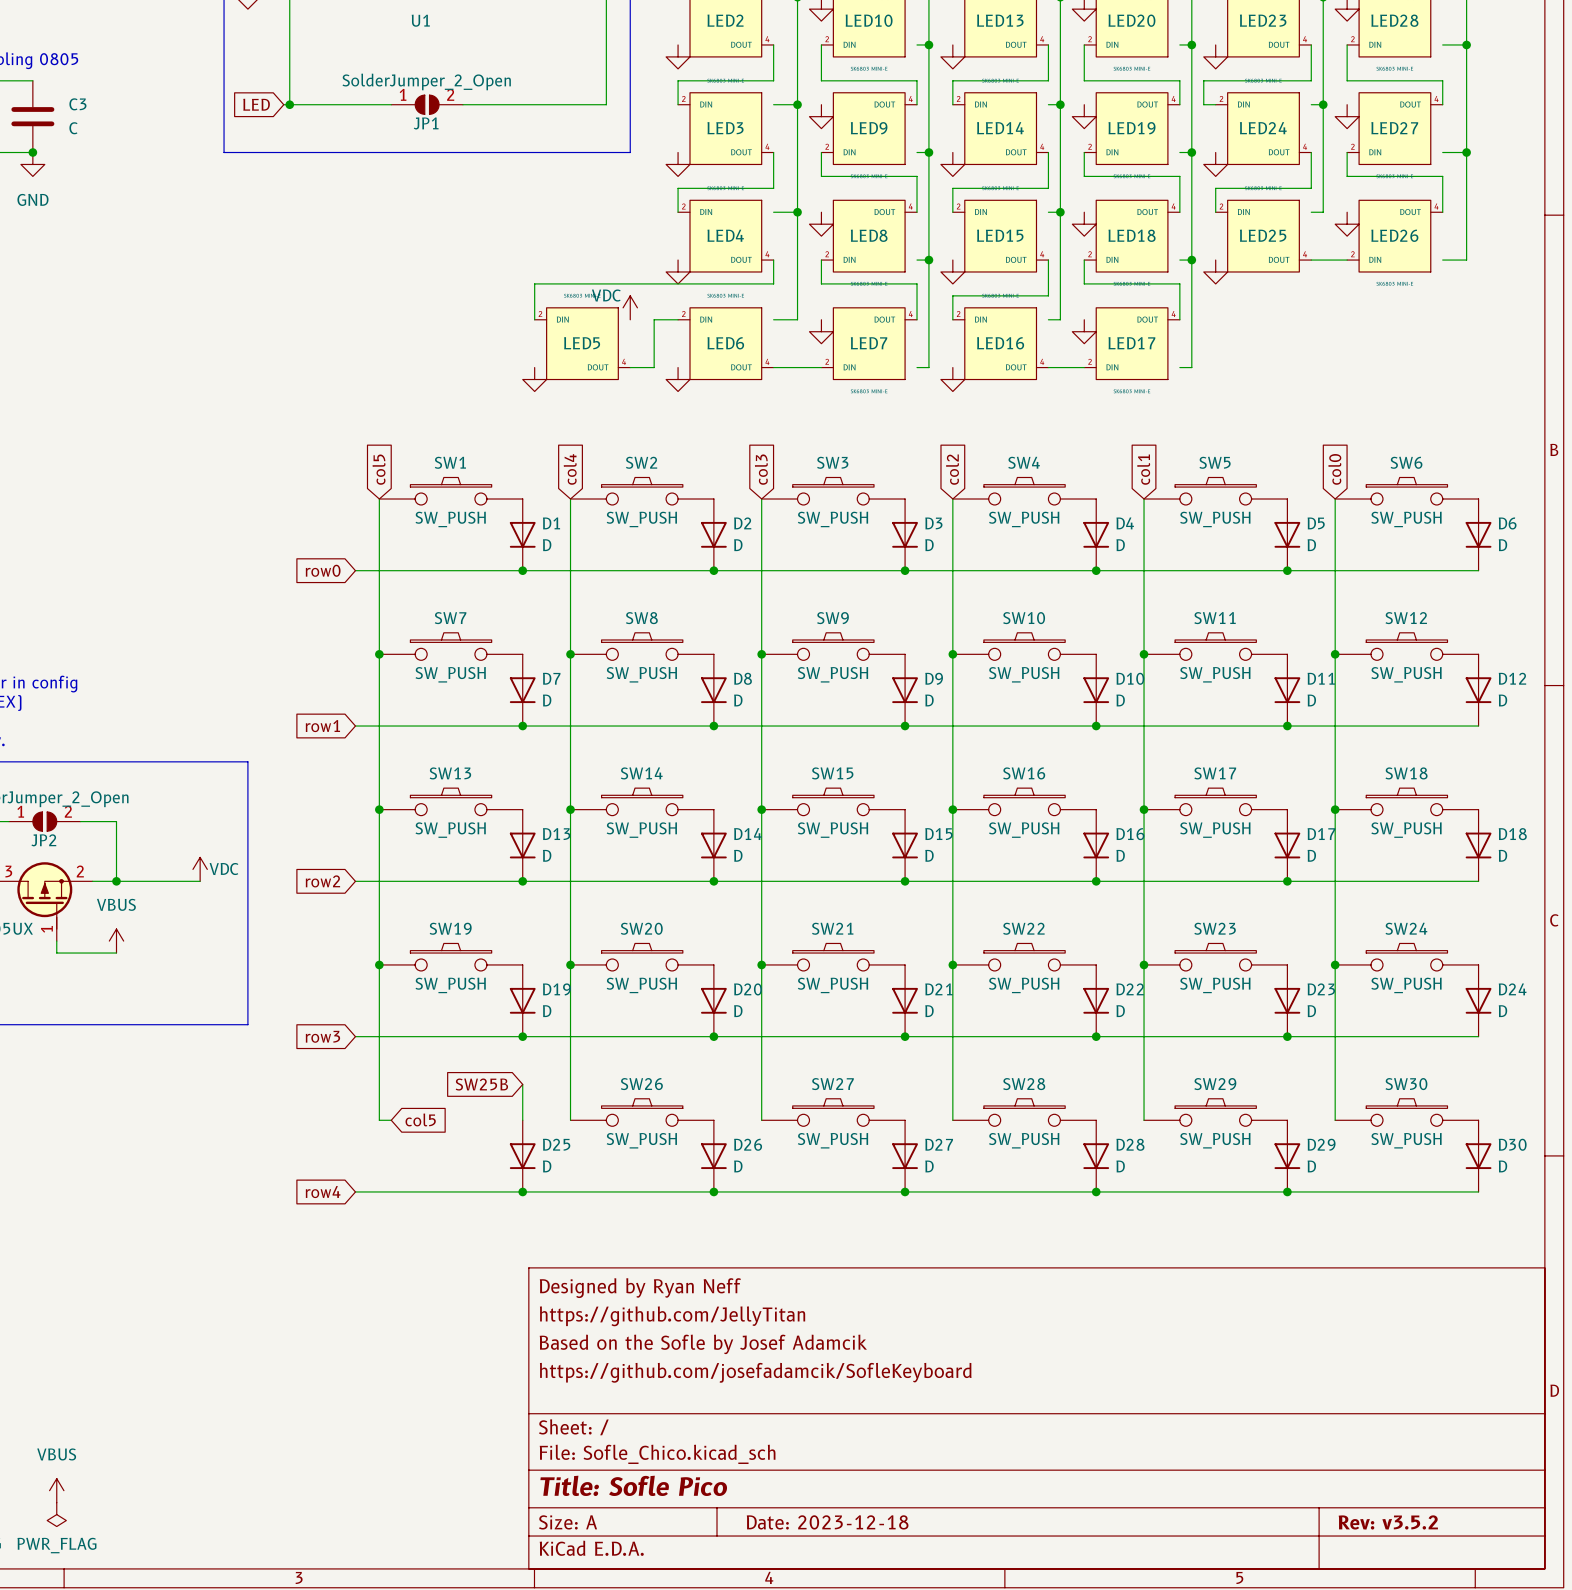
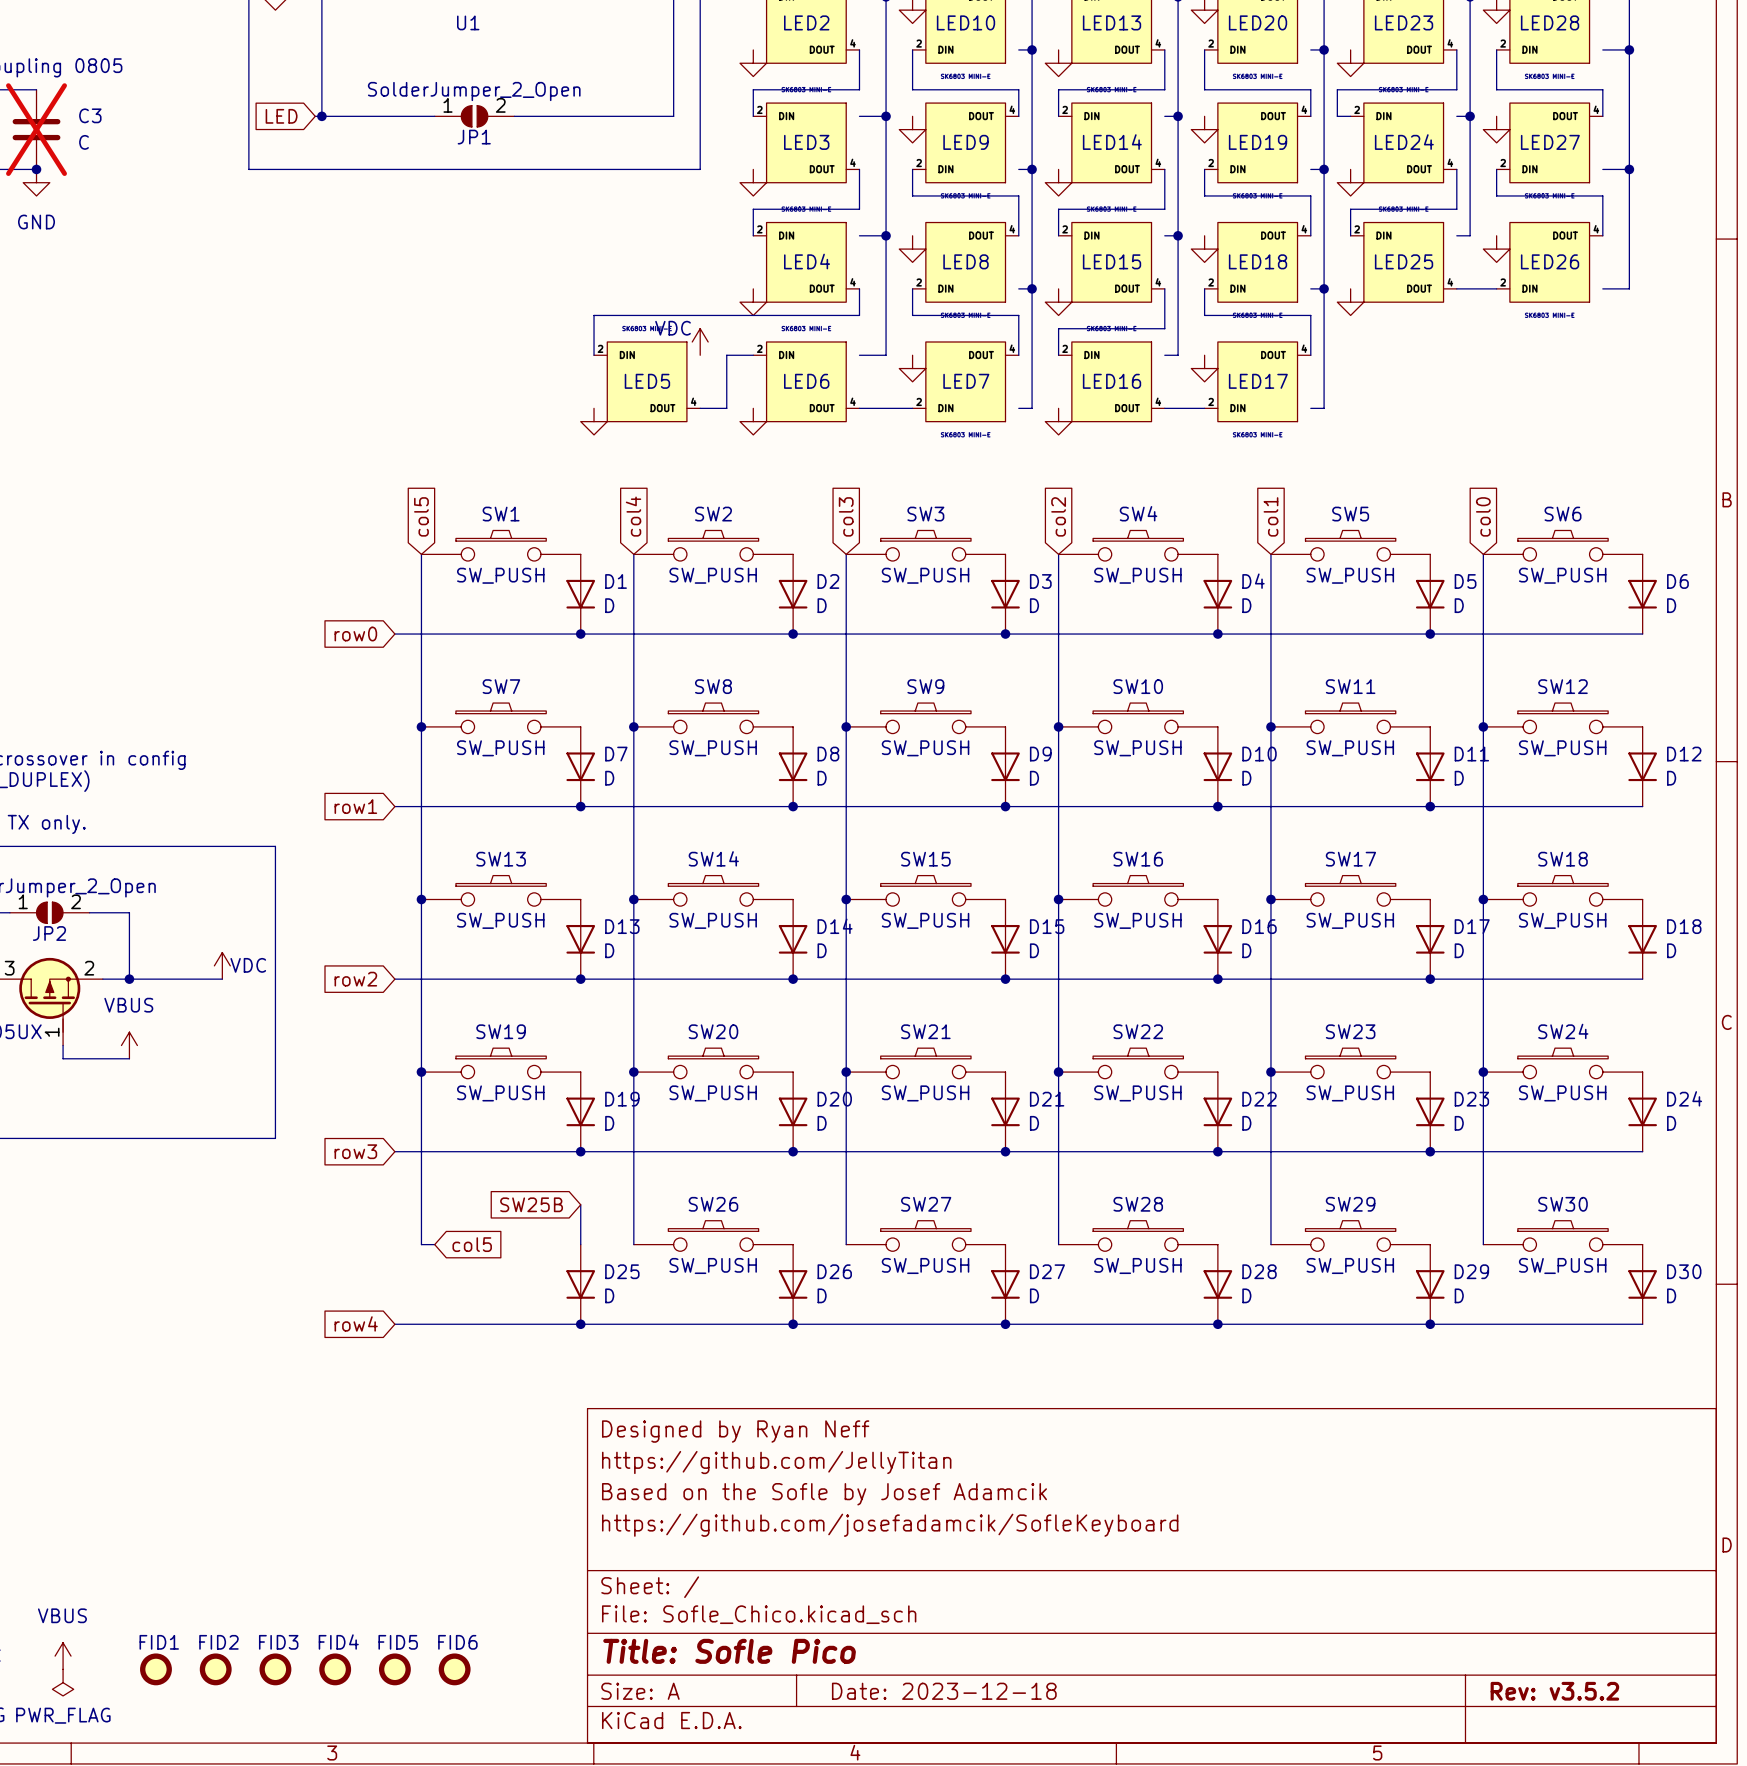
C3 do-not-place cross: none -> (36, 129)
FID1: none -> (155, 1669)
FID2: none -> (215, 1669)
FID3: none -> (275, 1669)
FID4: none -> (335, 1669)
FID5: none -> (394, 1669)
FID6: none -> (454, 1669)

